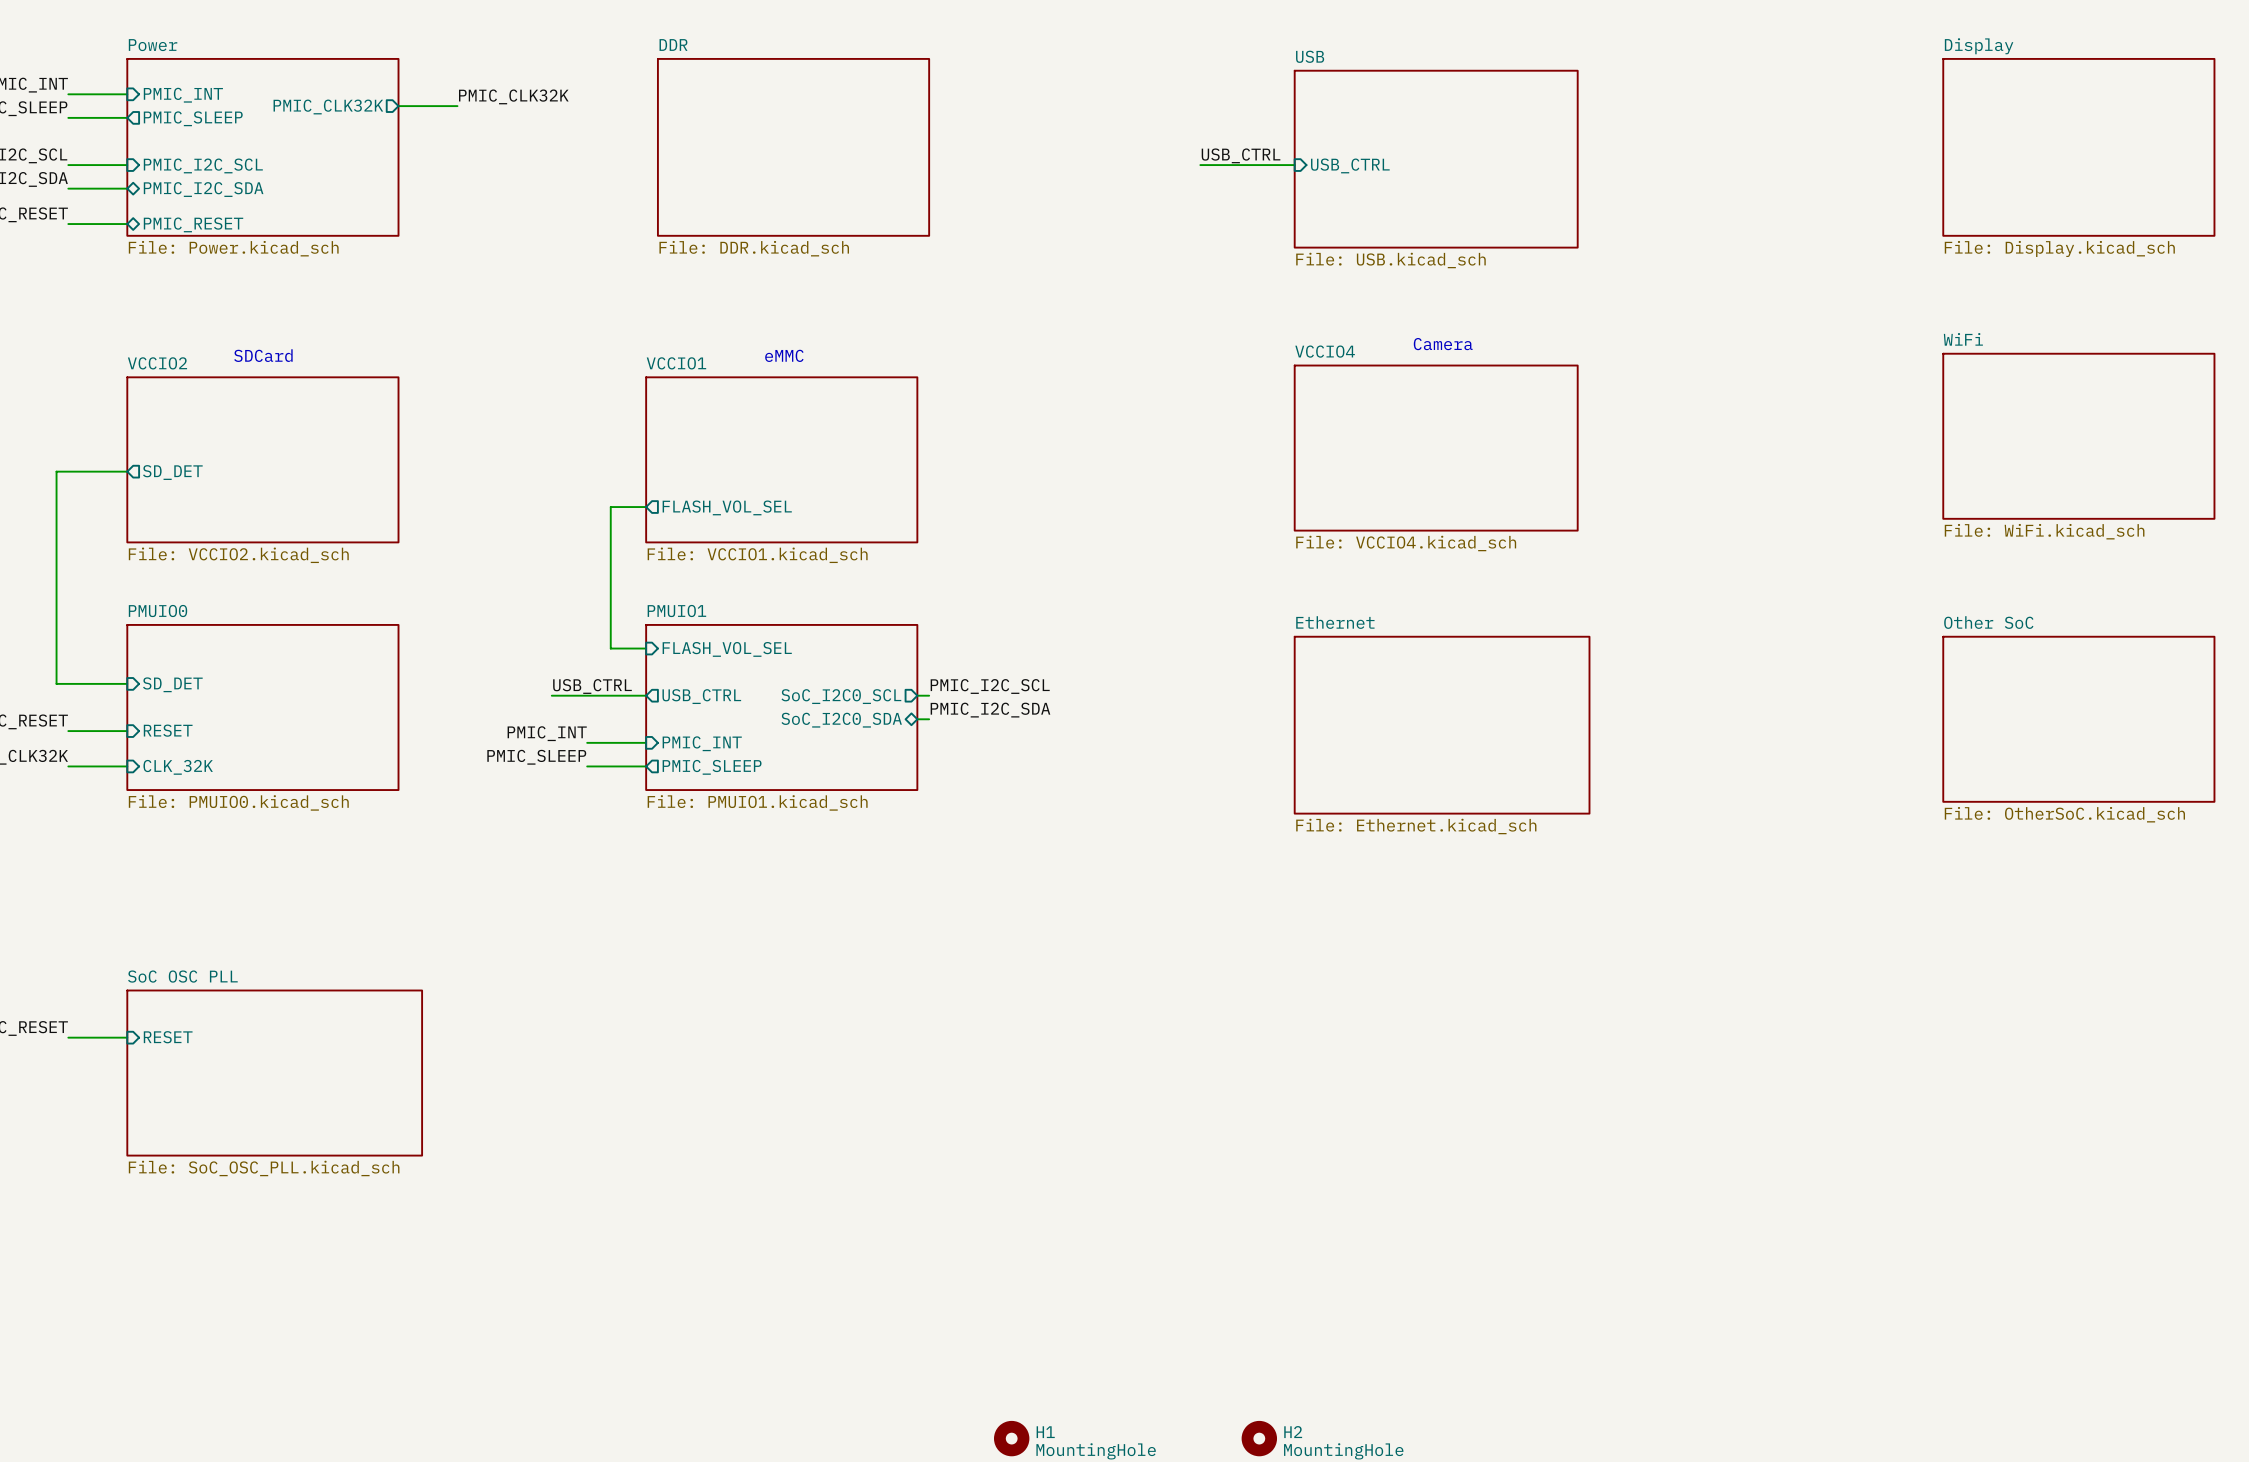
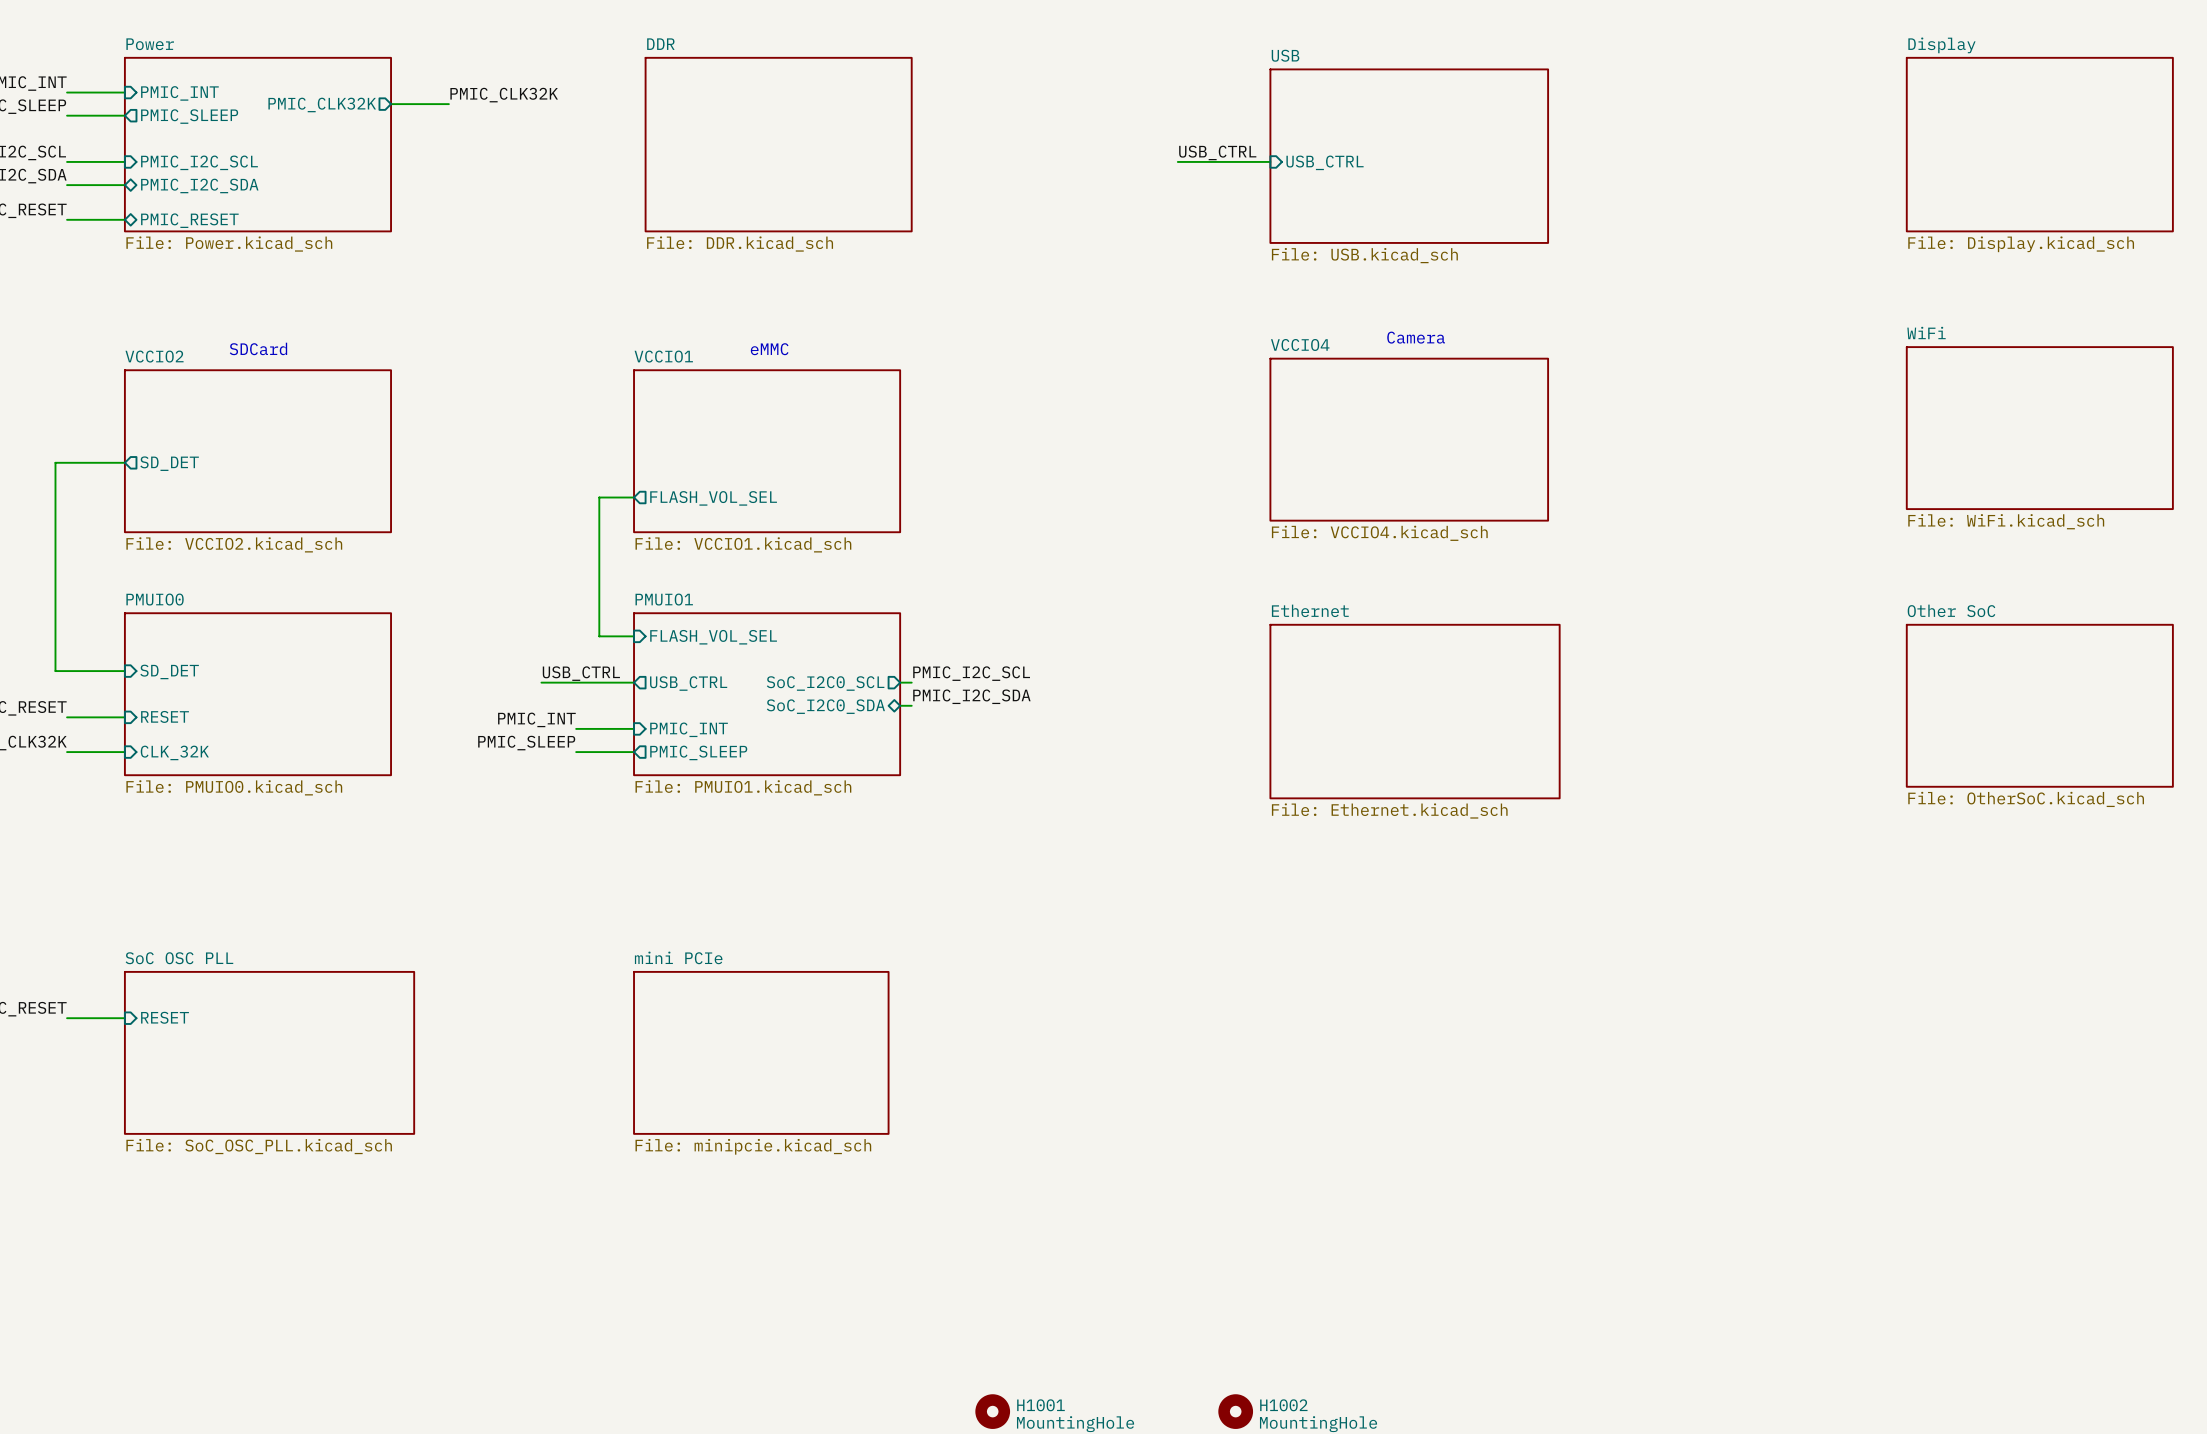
sheet mini PCIe: none -> File: minipcie.kicad_sch (761, 1052)
H1 name: H1 (1045, 1432) -> H1001 (1040, 1405)
H2 name: H2 (1293, 1432) -> H1002 (1283, 1405)

